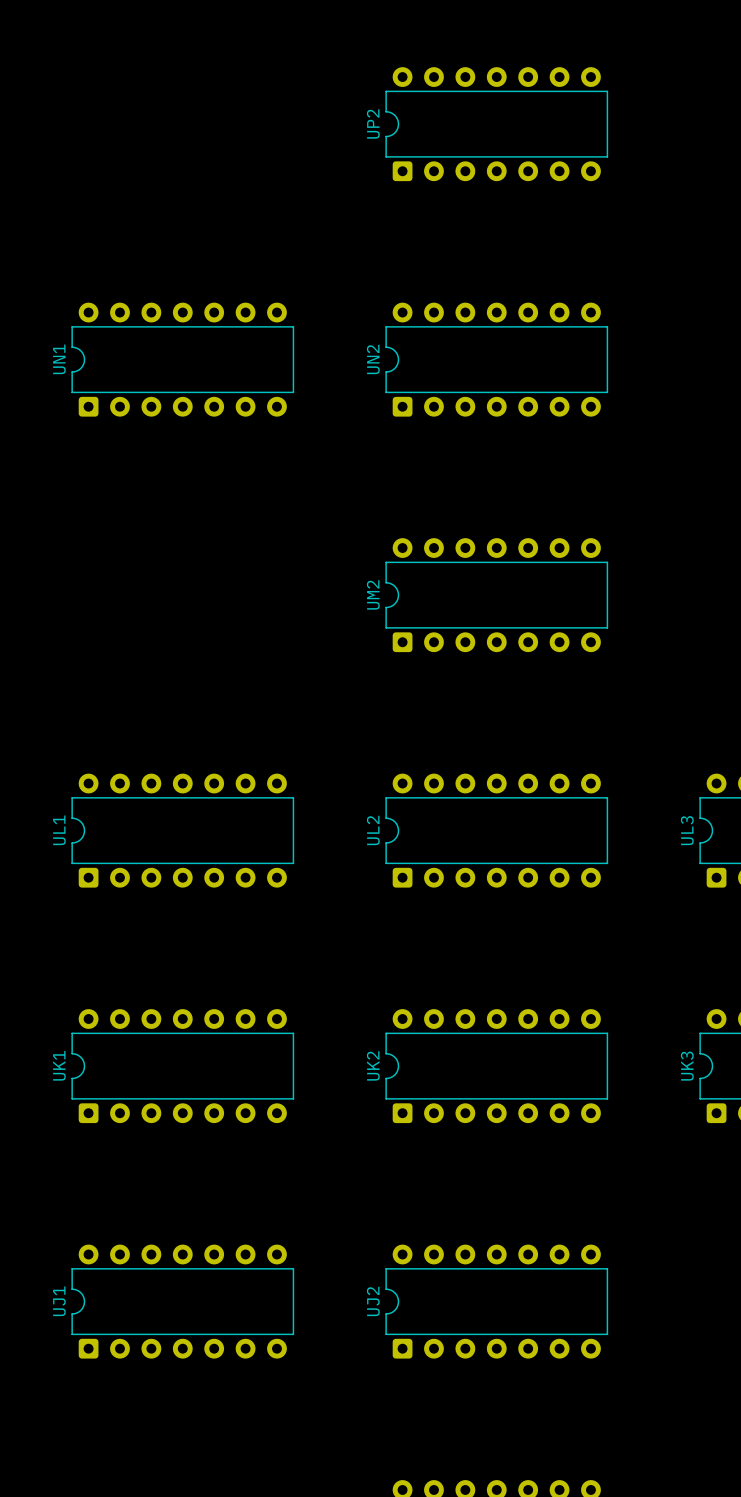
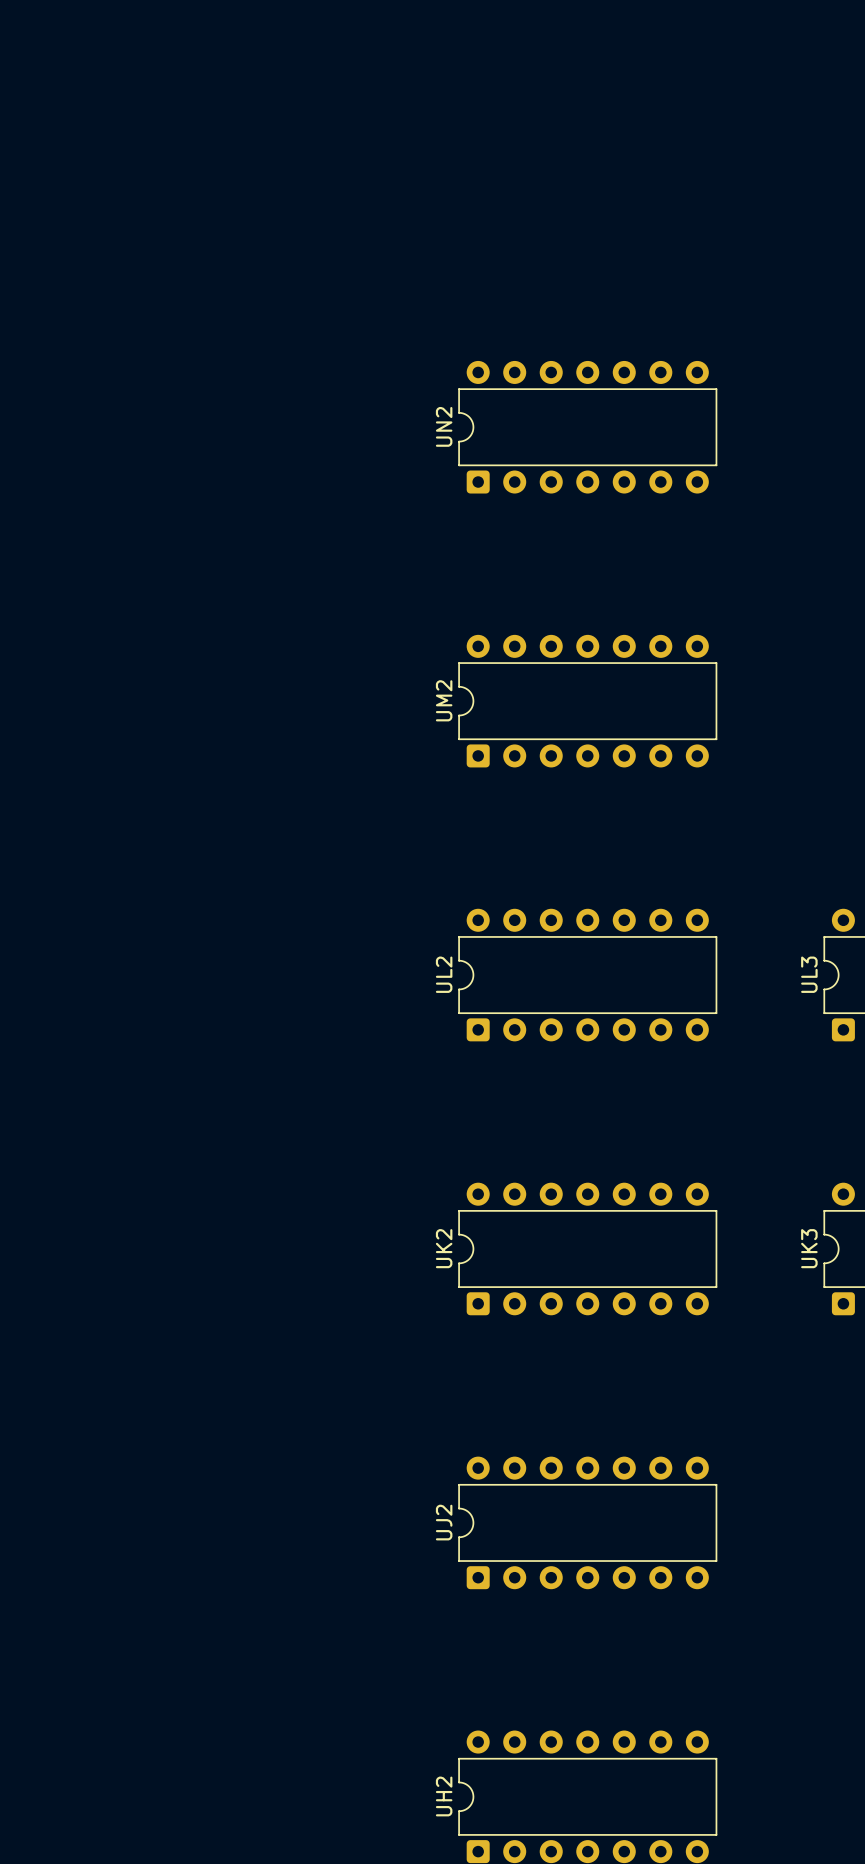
UP2: (496, 124) -> none
UN1: (182, 359) -> none
UL1: (182, 830) -> none
UK1: (182, 1066) -> none
UJ1: (182, 1301) -> none

